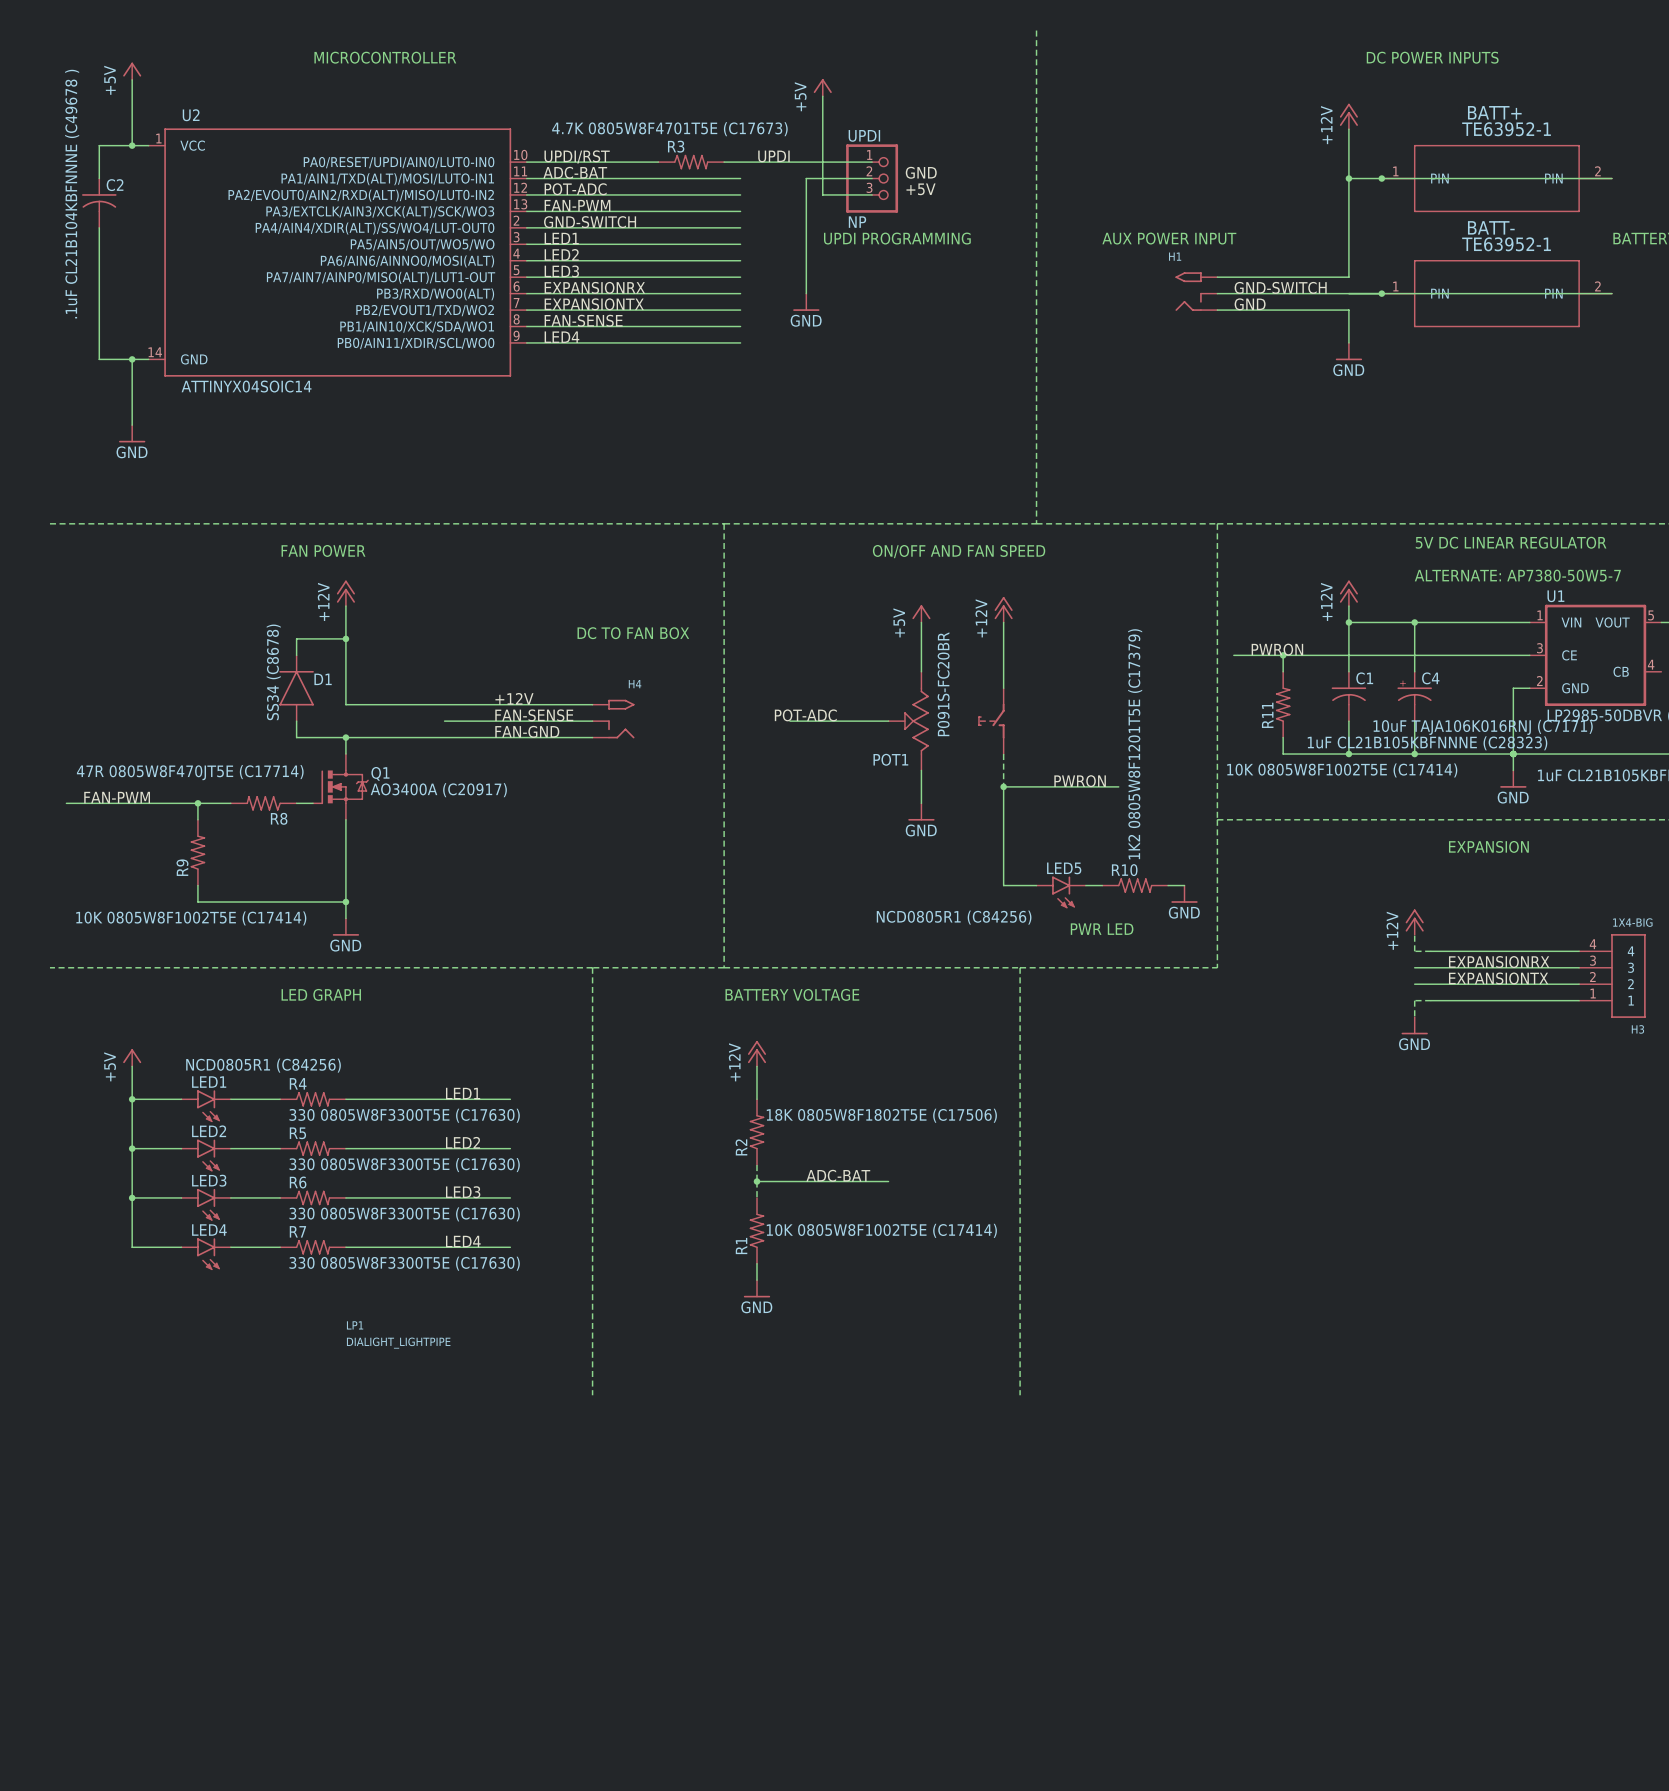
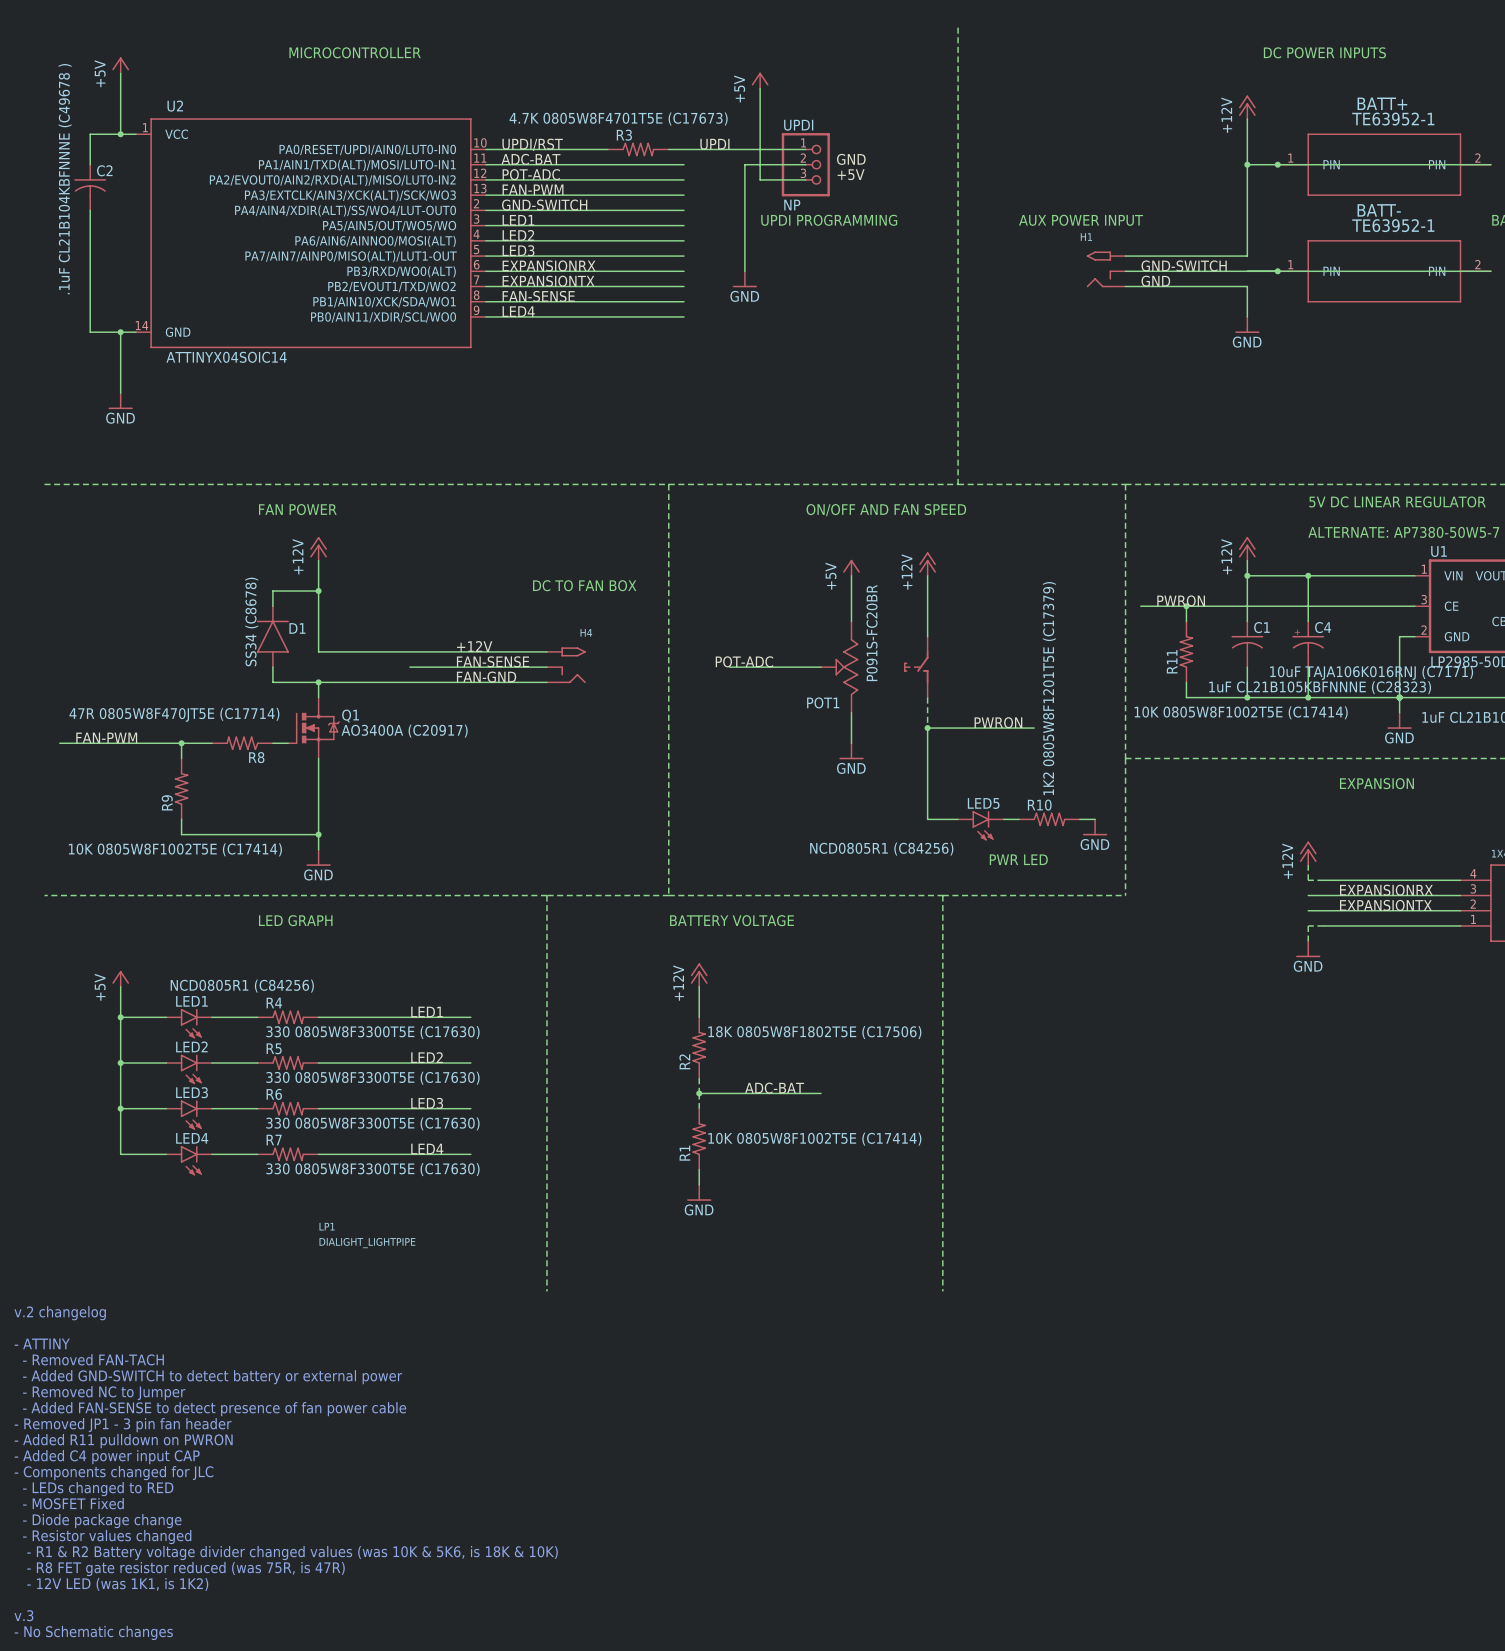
text: none -> v.2 changelog (60, 1313)
text: none -> - ATTINY (42, 1343)
text: none -> - Removed FAN-TACH (93, 1359)
text: none -> - Added GND-SWITCH to detect battery or external power (212, 1377)
text: none -> - Removed NC to Jumper (104, 1393)
text: none -> - Added FAN-SENSE to detect presence of fan power cable (214, 1409)
text: none -> - Removed JP1 - 3 pin fan header (123, 1425)
text: none -> - Added R11 pulldown on PWRON (123, 1441)
text: none -> - Added C4 power input CAP (107, 1457)
text: none -> - Components changed for JLC (114, 1473)
text: none -> - LEDs changed to RED (98, 1489)
text: none -> - MOSFET Fixed (73, 1503)
text: none -> - Diode package change (102, 1521)
text: none -> - Resistor values changed (107, 1537)
text: none -> - R1 & R2 Battery voltage divider changed values (was 10K & 5K6, is 18K & 10K) (292, 1553)
text: none -> - R8 FET gate resistor reduced (was 75R, is 47R) (186, 1569)
text: none -> - 12V LED (was 1K1, is 1K2) (117, 1584)
text: none -> v.3 (23, 1615)
text: none -> - No Schematic changes (93, 1632)

